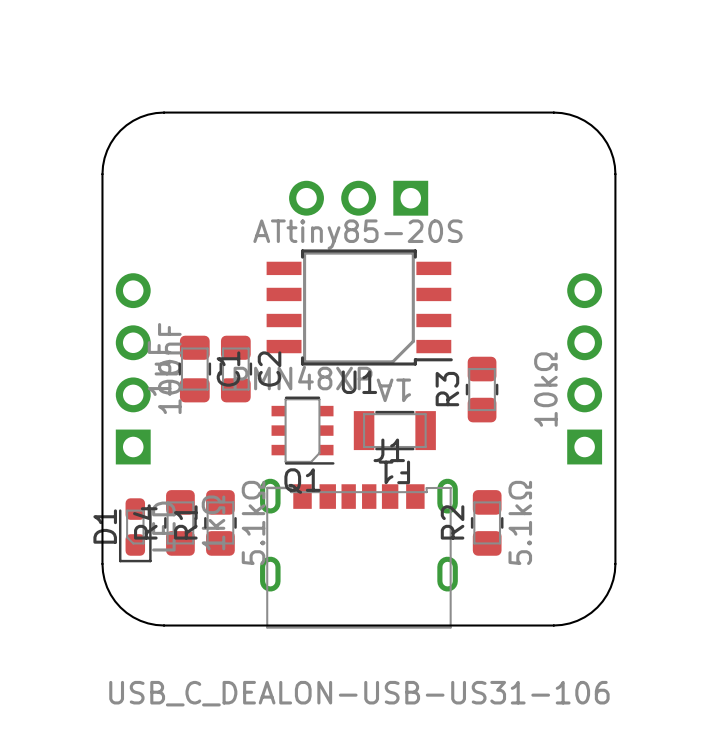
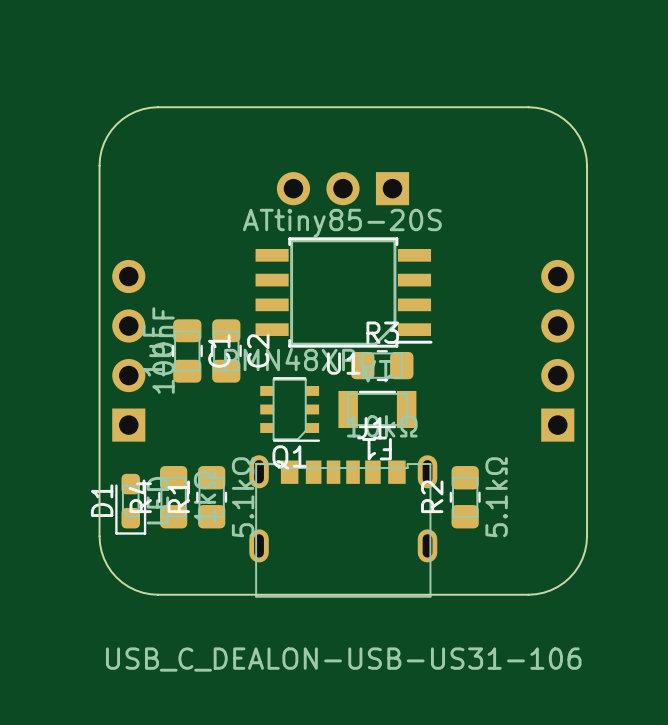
R3 rotation: 0° (482, 389) -> 90° clockwise (382, 365)
R3 position: (482, 389) -> (382, 365)

